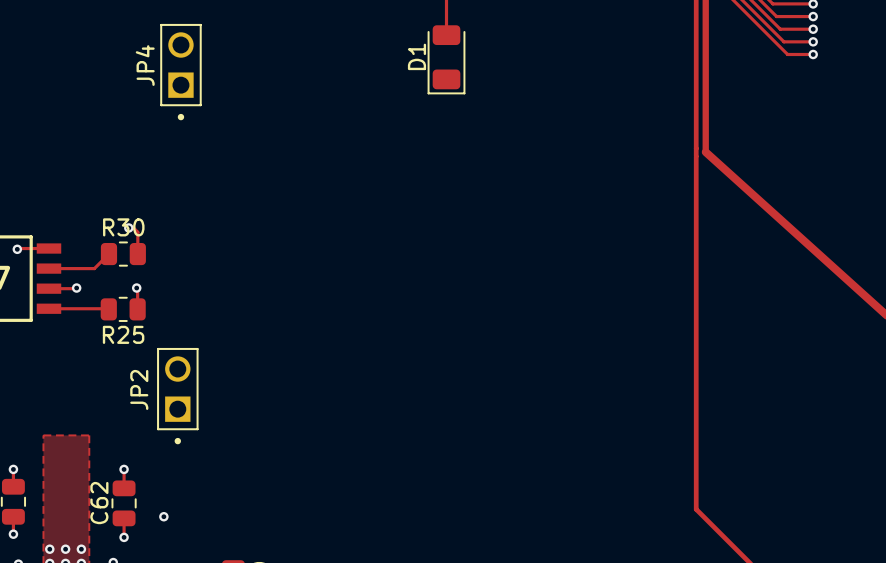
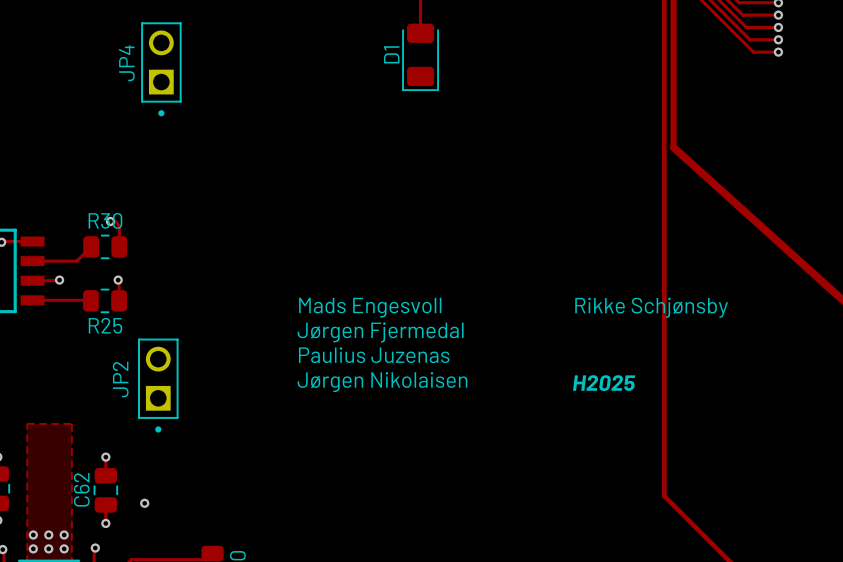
text: none -> Mads Engesvoll (370, 307)
text: none -> Rikke Schjønsby (651, 307)
text: none -> Jørgen Fjermedal (380, 332)
text: none -> Paulius Juzenas (374, 355)
text: none -> Jørgen Nikolaisen (382, 382)
text: none -> H2025 (604, 383)

